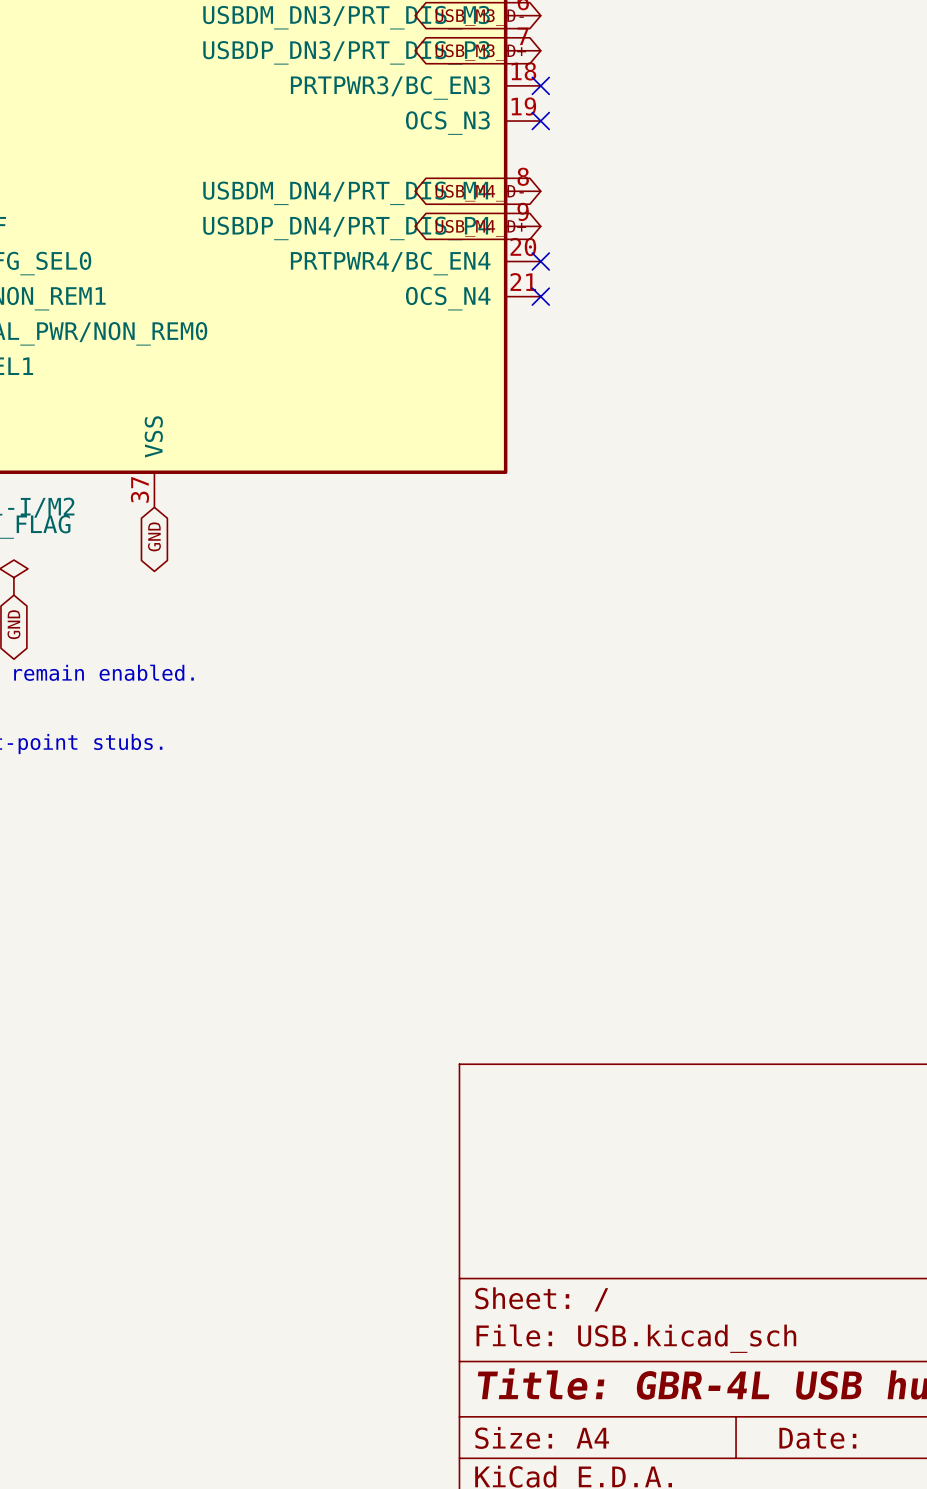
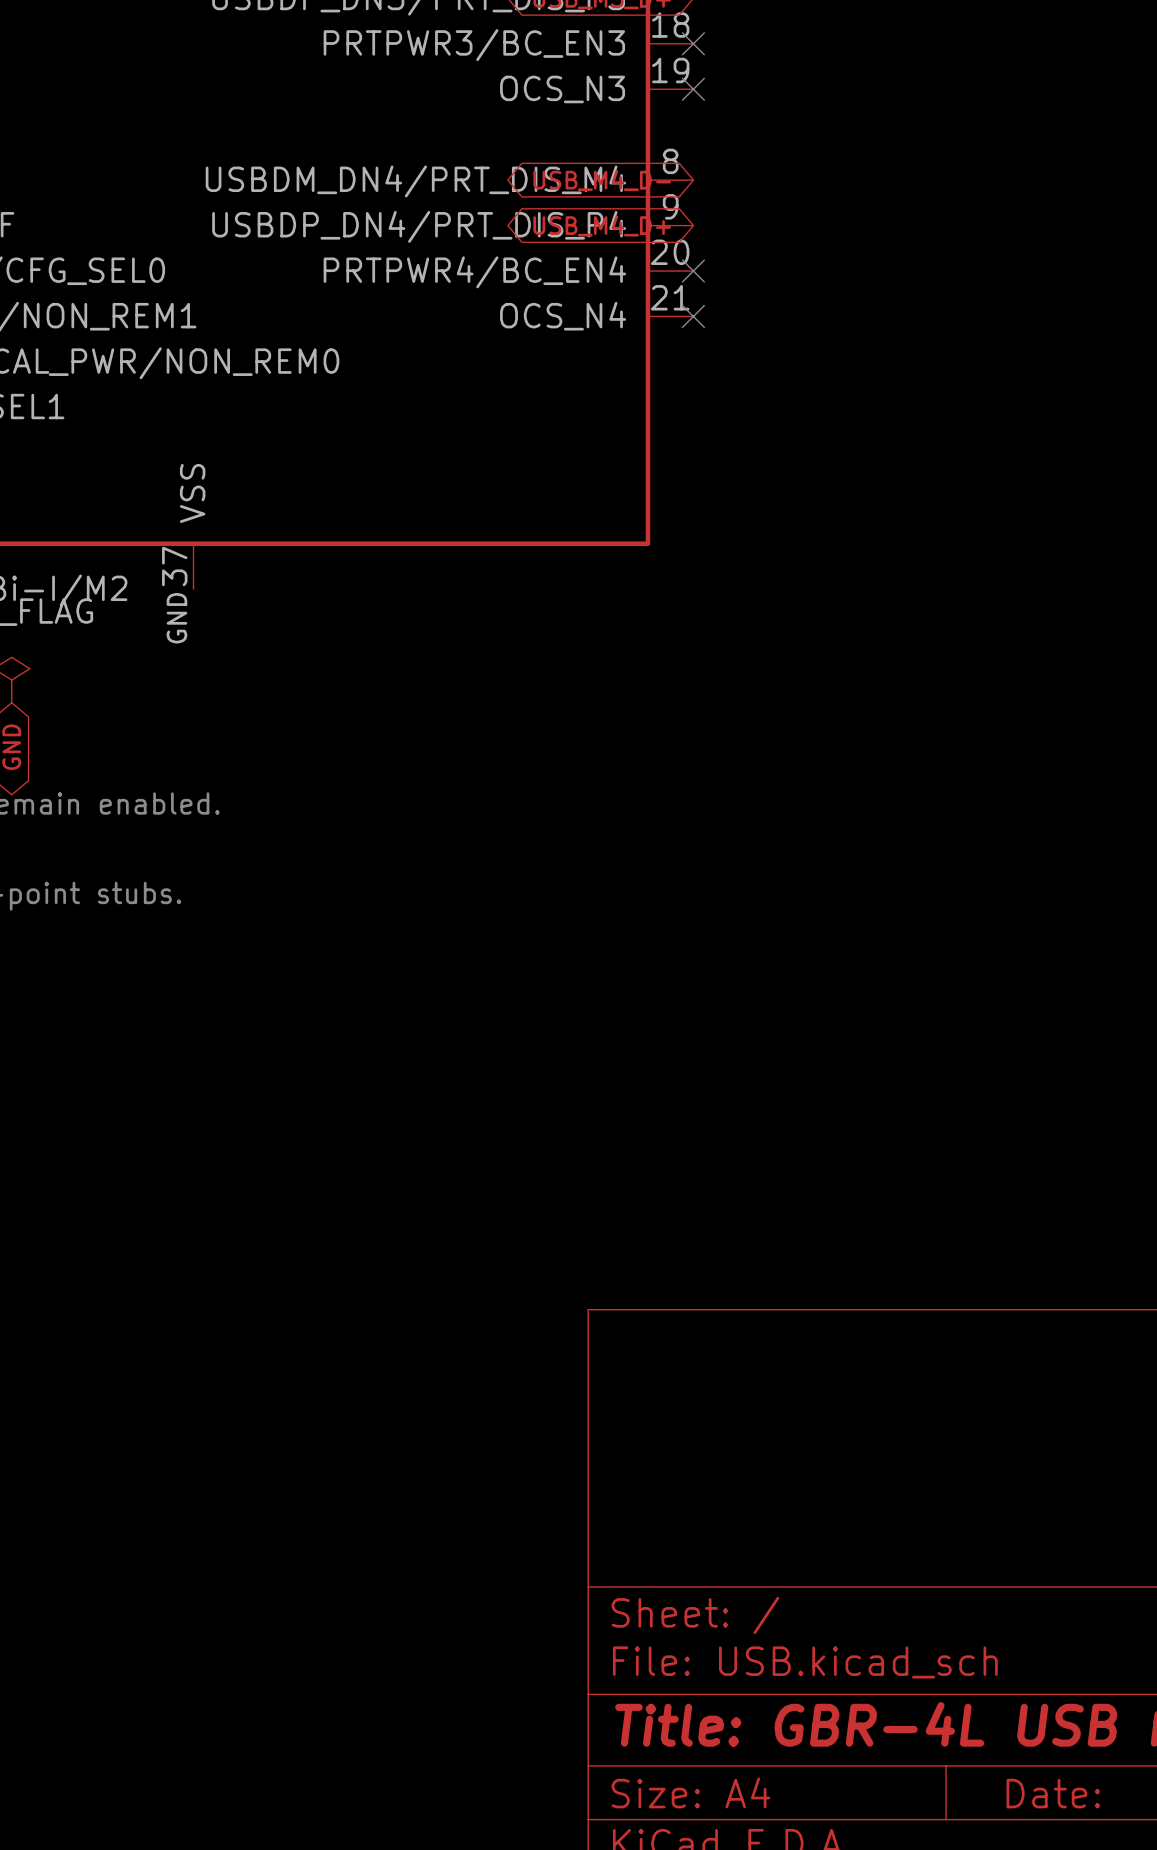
label: none -> GND (176, 618)
global label: GND (154, 536) -> none

